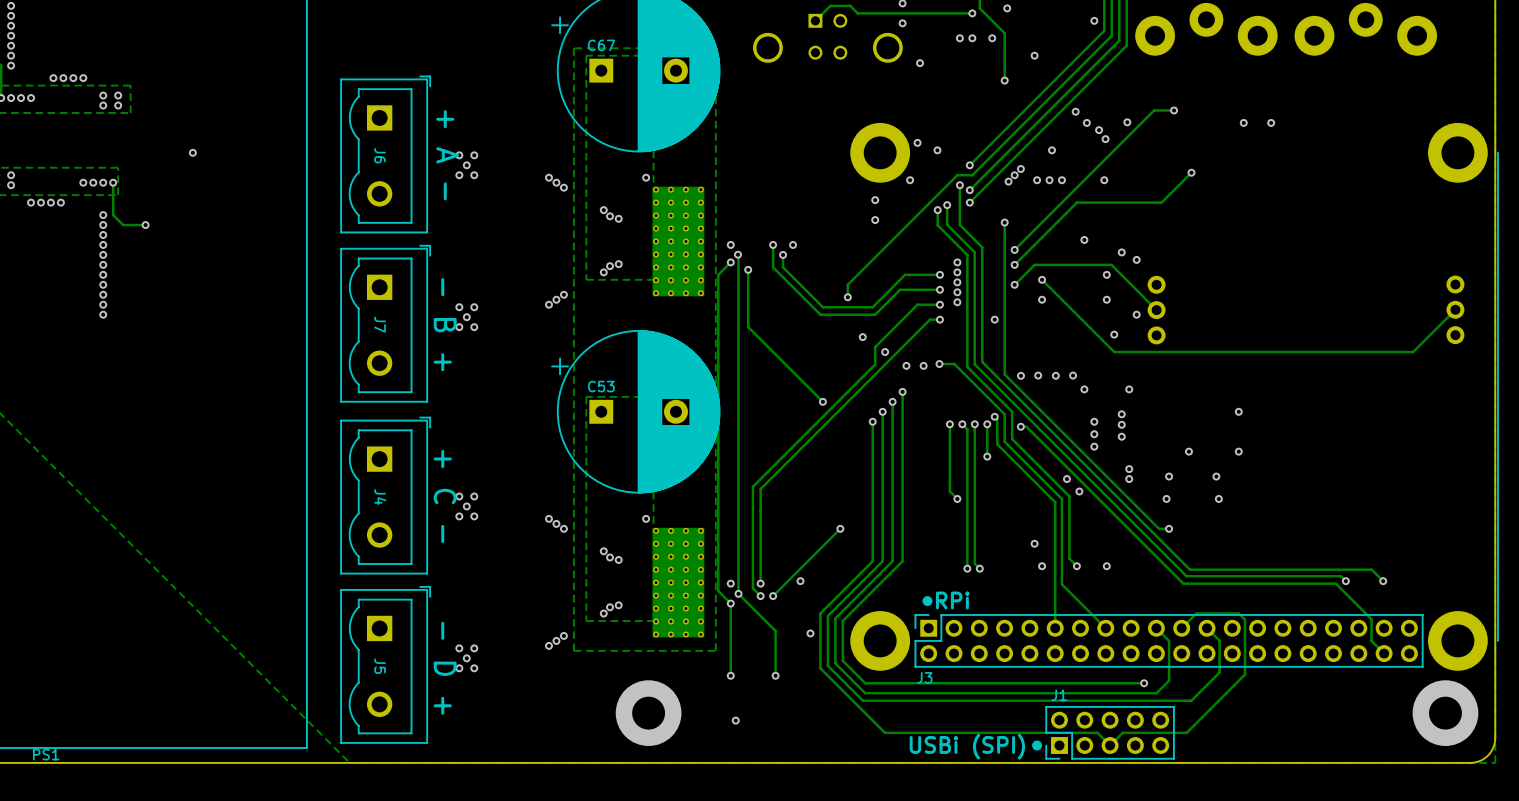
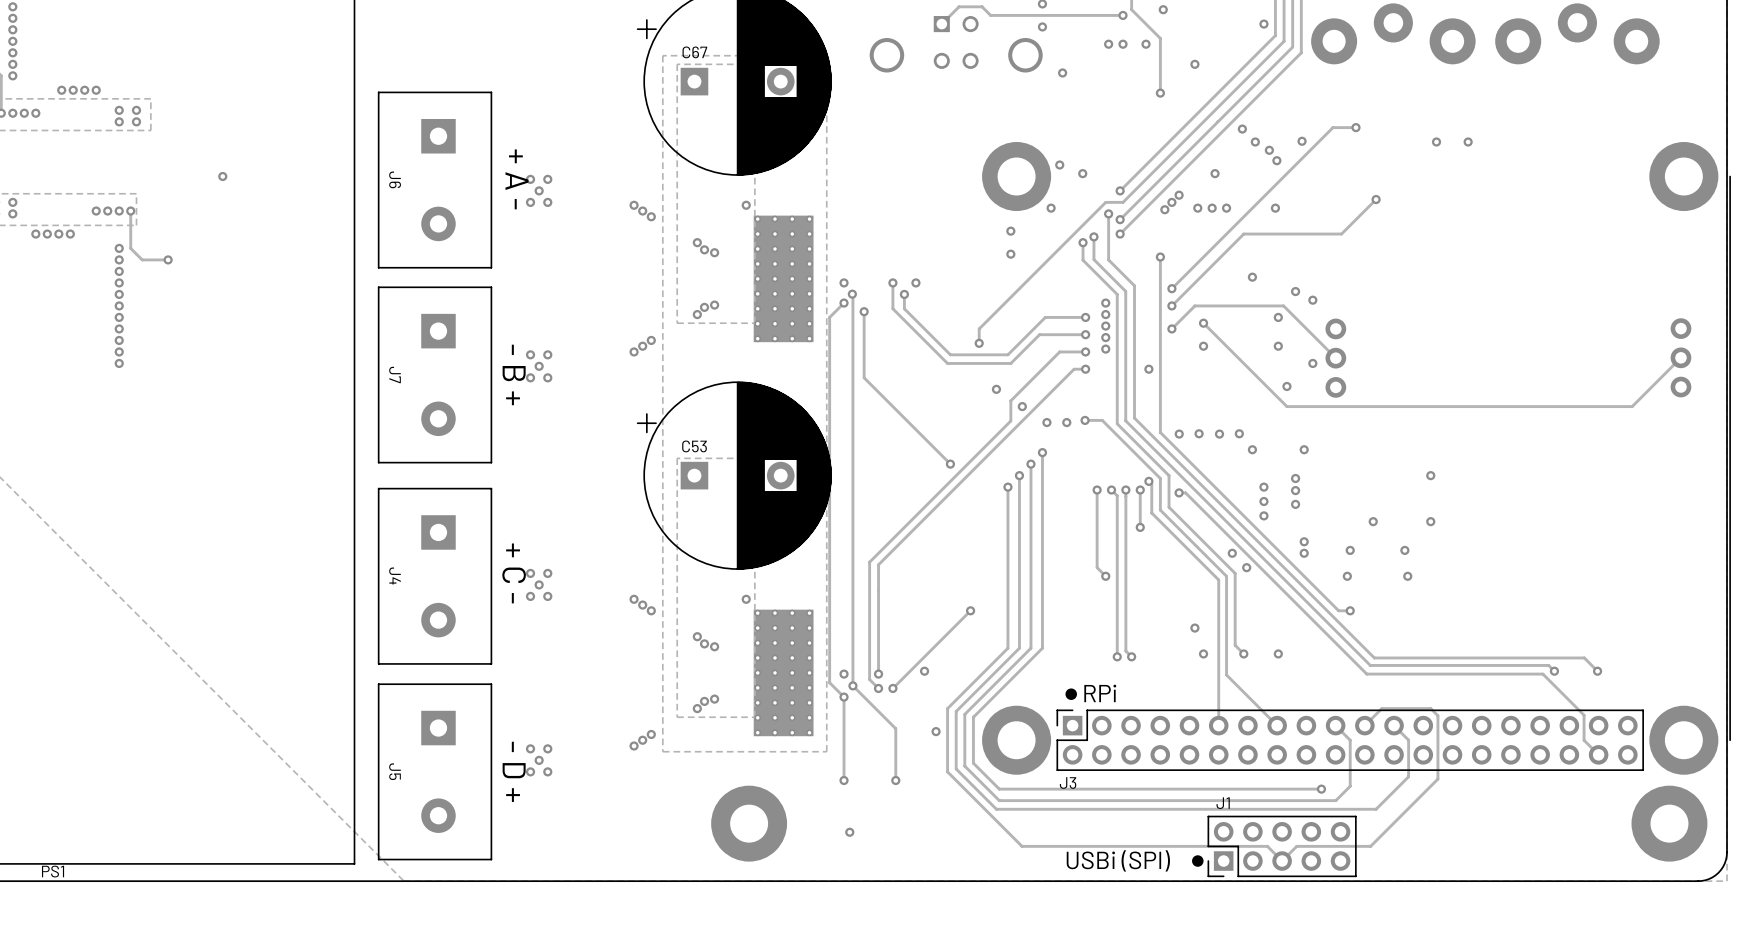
J6 footprint: [340, 75, 431, 234] -> [377, 91, 493, 269]
J6 name position: J6 (380, 155) -> J6 (395, 179)
J7 footprint: [340, 245, 431, 403] -> [377, 286, 493, 464]
J7 name position: J7 (380, 324) -> J7 (395, 375)
J4 footprint: [340, 416, 431, 575] -> [377, 487, 493, 665]
J4 name position: J4 (380, 497) -> J4 (395, 576)
J5 footprint: [340, 586, 431, 744] -> [377, 683, 493, 861]
J5 name position: J5 (380, 666) -> J5 (395, 771)

